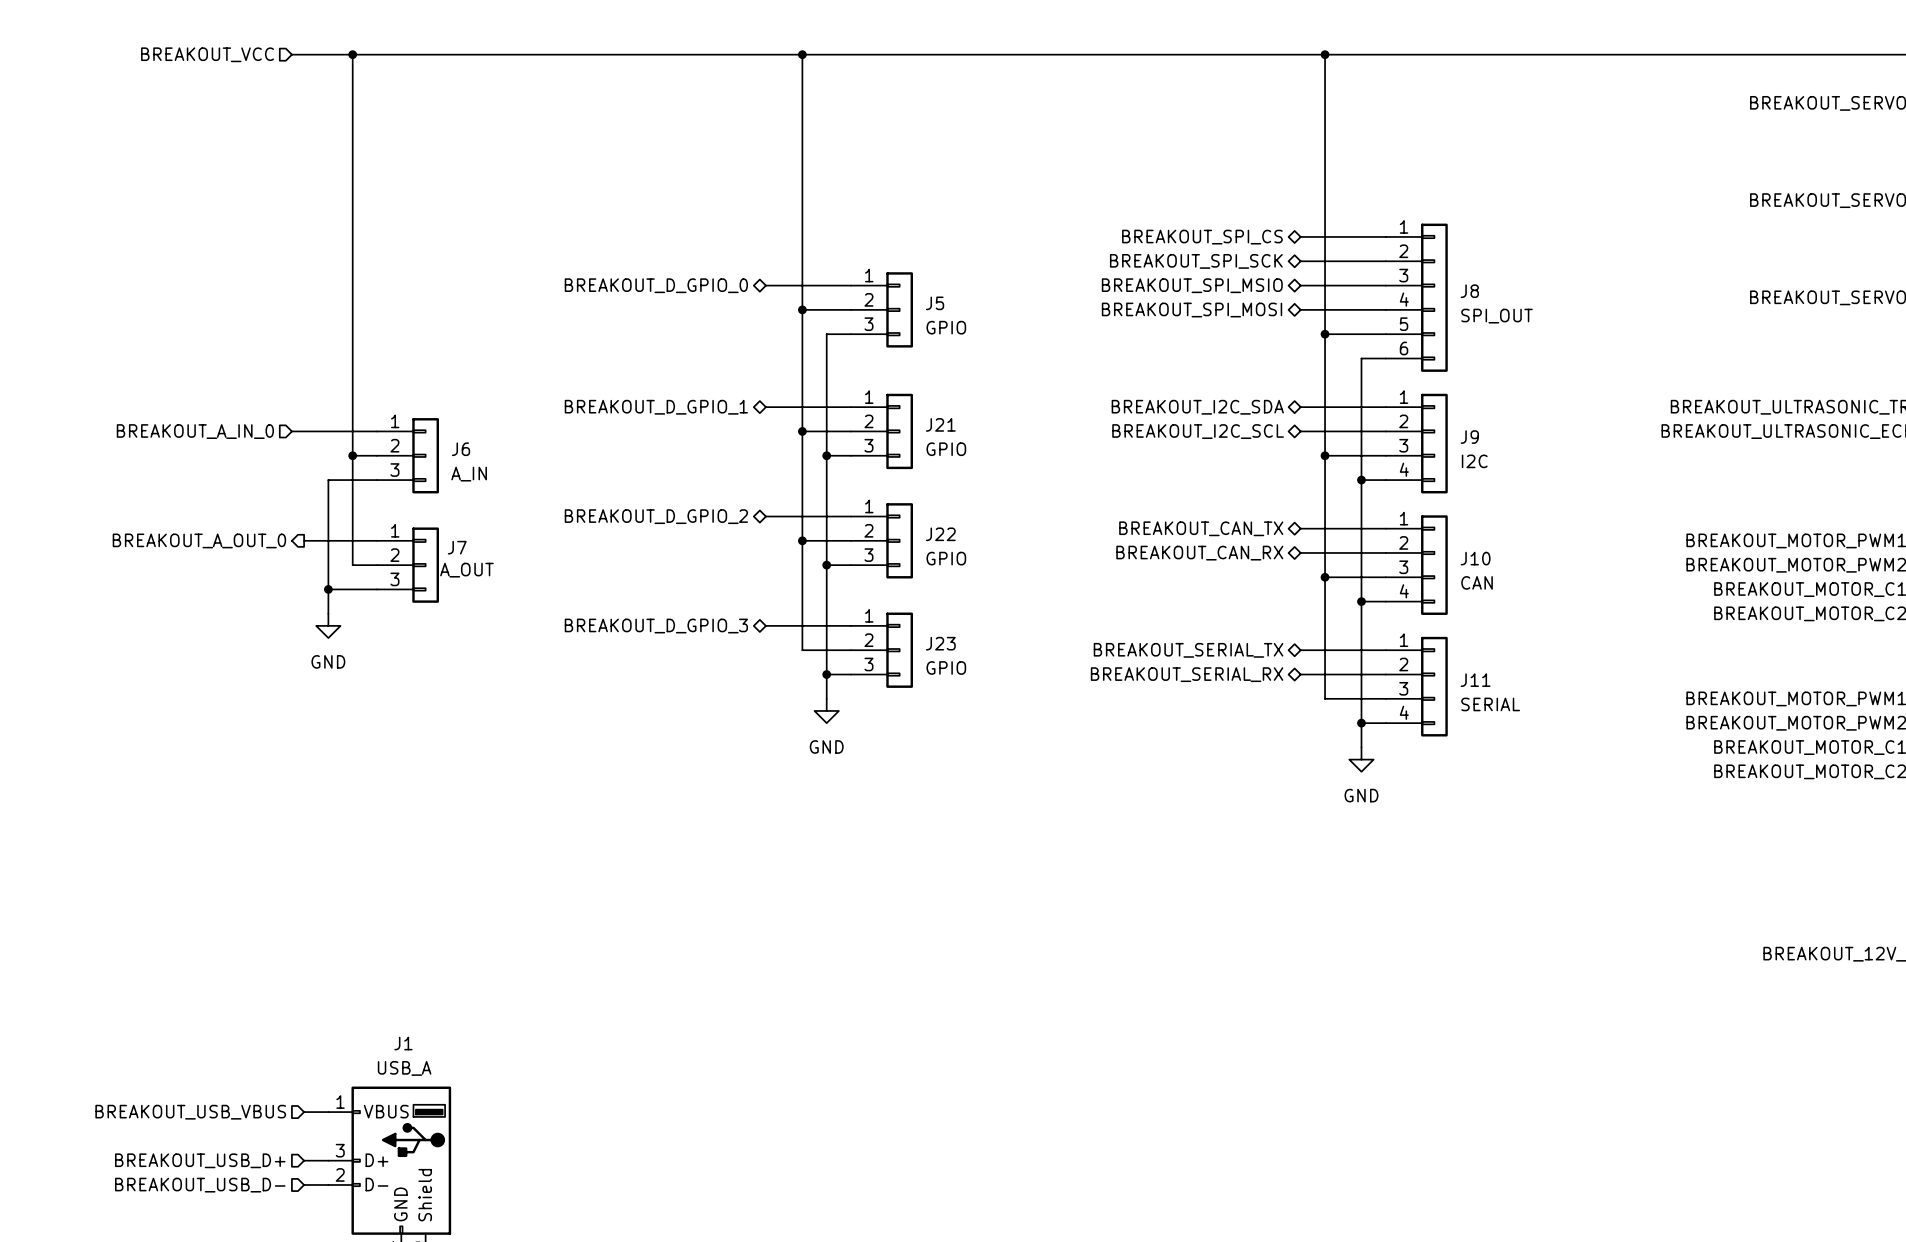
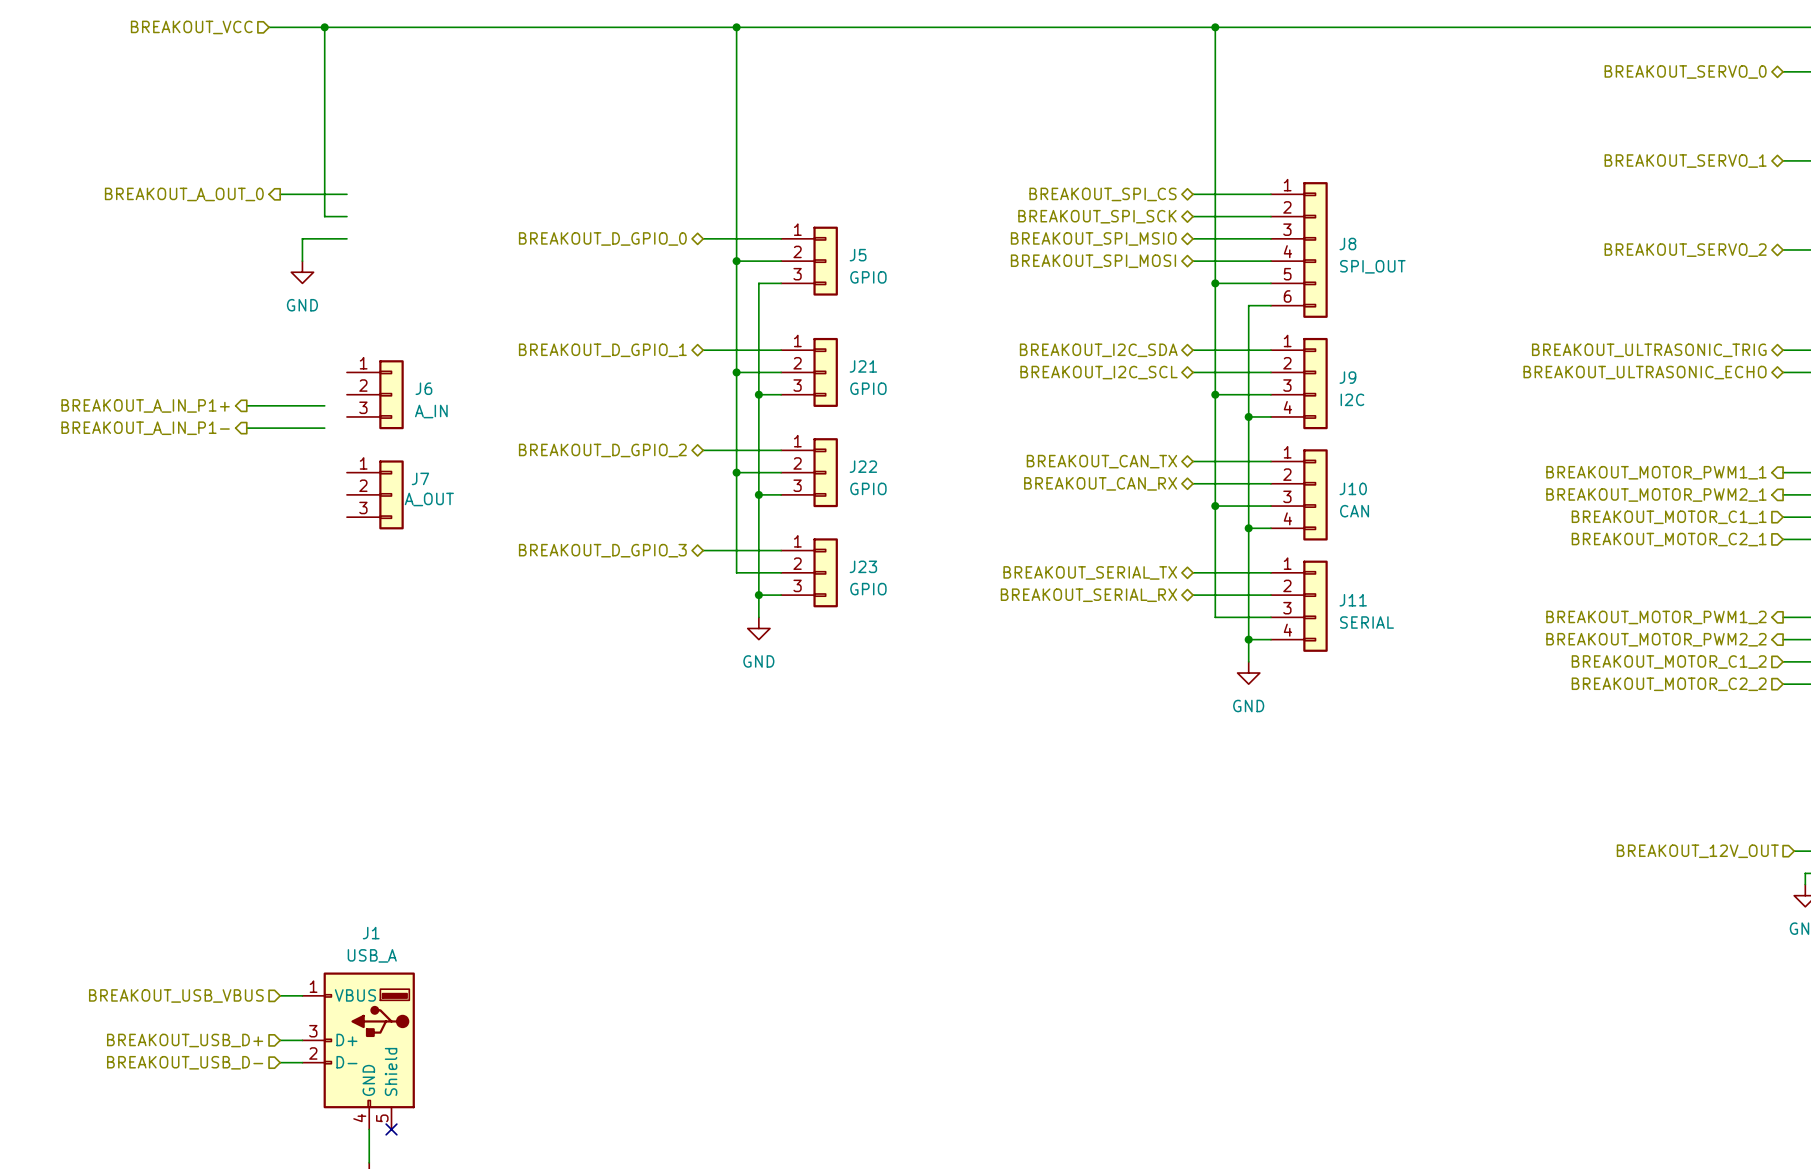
wire: none -> (280, 194) (346, 194)
hierarchical label: none -> BREAKOUT_A_OUT_0 (184, 194)
wire: (352, 261) (352, 565) (377, 565) -> (324, 216) (346, 216)
wire: none -> (346, 238) (302, 238) (302, 261)
power symbol: none -> GND (302, 272)
hierarchical label: BREAKOUT_A_IN_0 (195, 431) -> none
wire: (291, 431) (377, 431) -> (246, 405) (324, 405)
wire: (352, 455) (377, 455) -> none
junction: (352, 455) -> none
hierarchical label: none -> BREAKOUT_A_IN_P1+ (145, 405)
wire: (377, 480) (328, 480) (328, 613) -> none
hierarchical label: none -> BREAKOUT_A_IN_P1- (145, 428)
wire: none -> (246, 428) (324, 428)
hierarchical label: BREAKOUT_A_OUT_0 (199, 540) -> none
wire: (304, 540) (377, 540) -> none
wire: (328, 589) (377, 589) -> none
junction: (328, 589) -> none
power symbol: GND (328, 625) -> none

